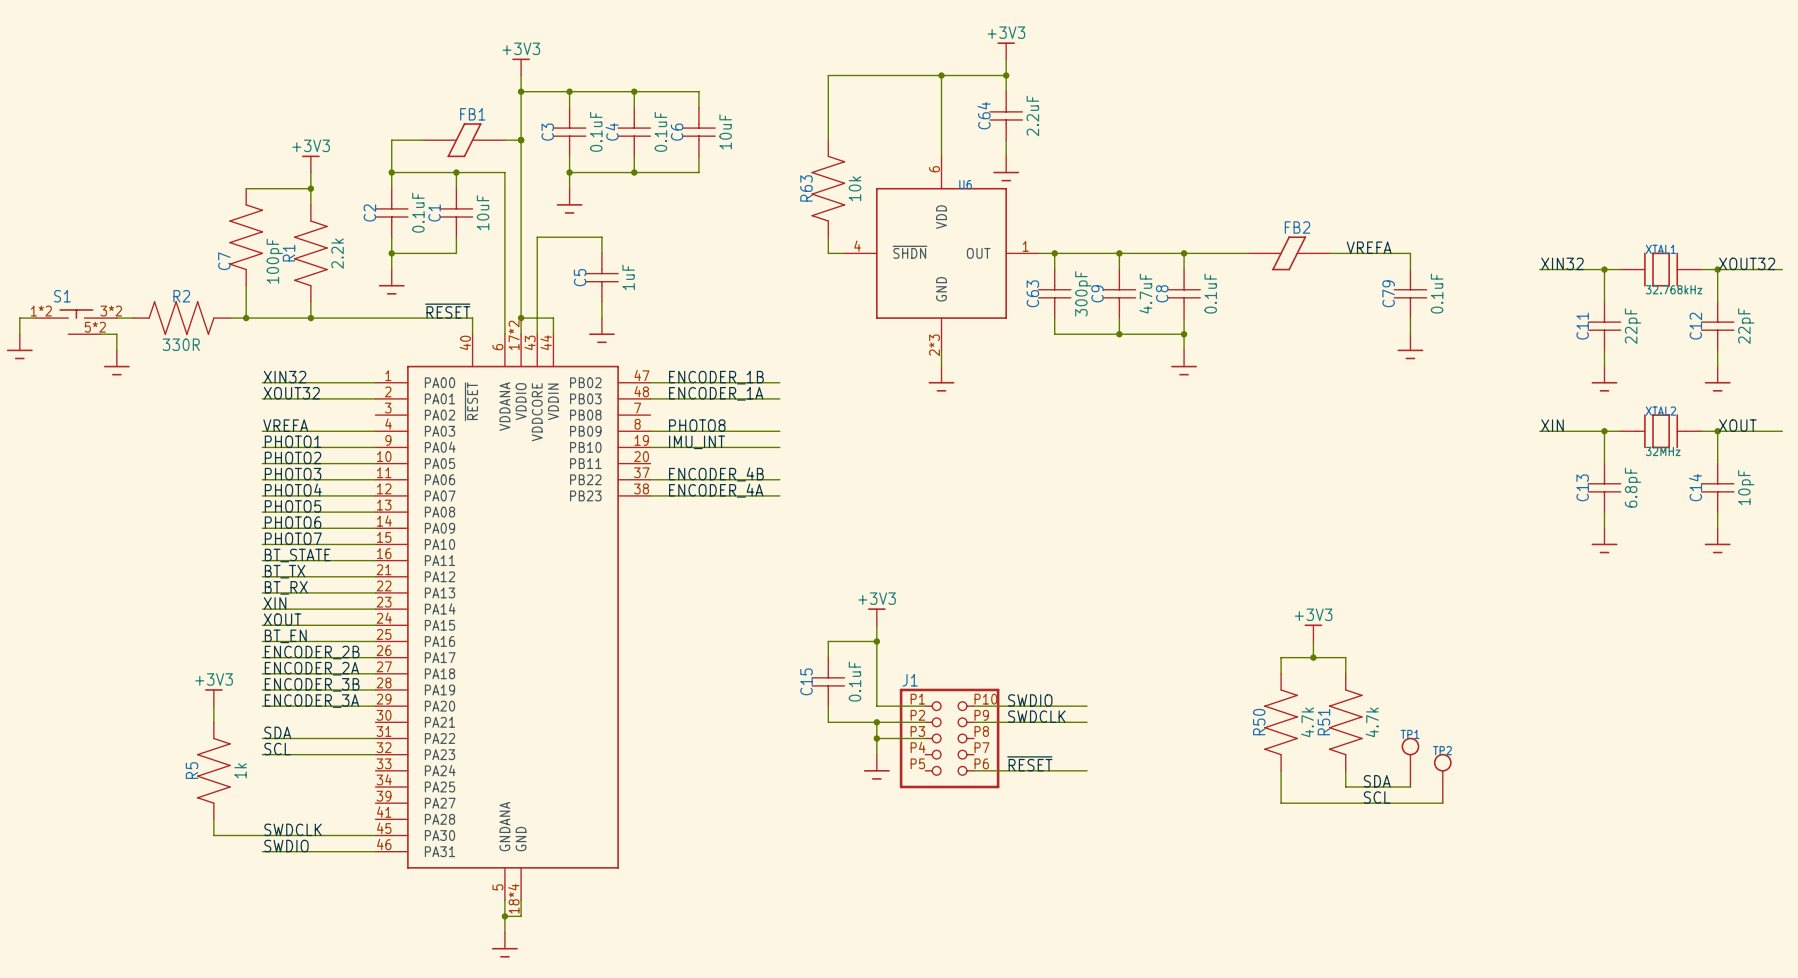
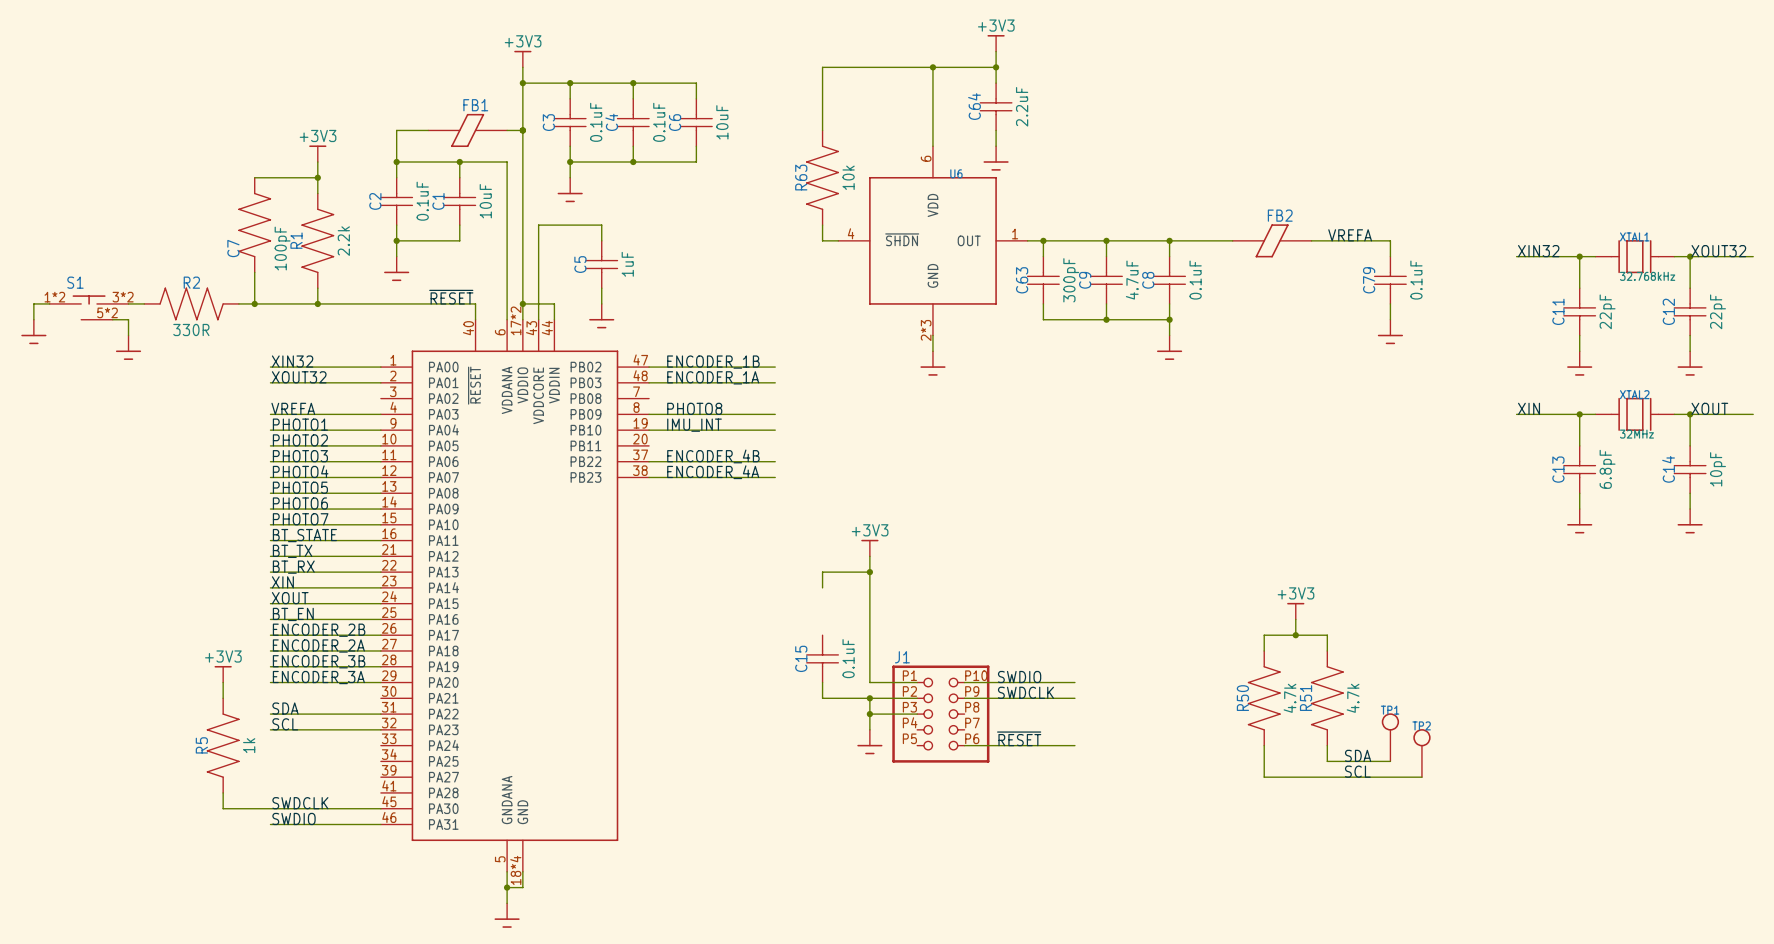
wire: none -> (869, 556) (869, 603)
junction: none -> (869, 572)
power symbol position: +3V3 (876, 616) -> +3V3 (869, 548)
wire: (876, 641) (828, 641) (828, 657) -> (869, 572) (822, 572) (822, 587)
junction: (876, 641) -> none

